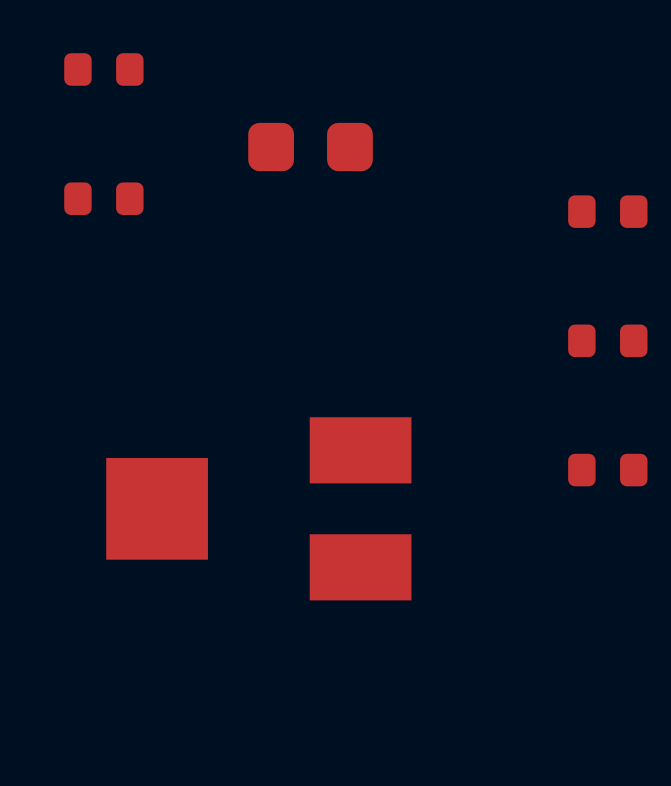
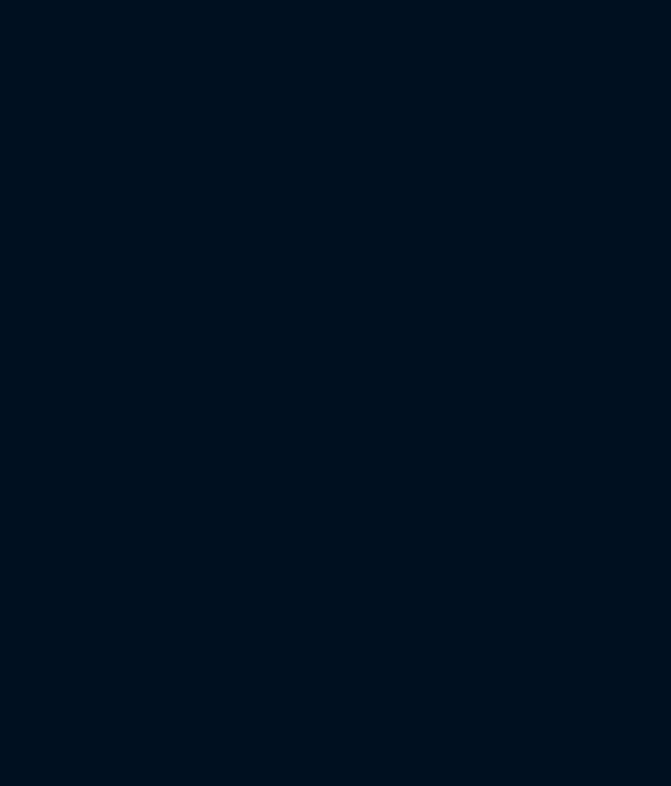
part: (103, 69) -> none
part: (310, 147) -> none
part: (103, 198) -> none
part: (607, 211) -> none
part: (607, 340) -> none
part: (607, 470) -> none
part: (258, 508) -> none

